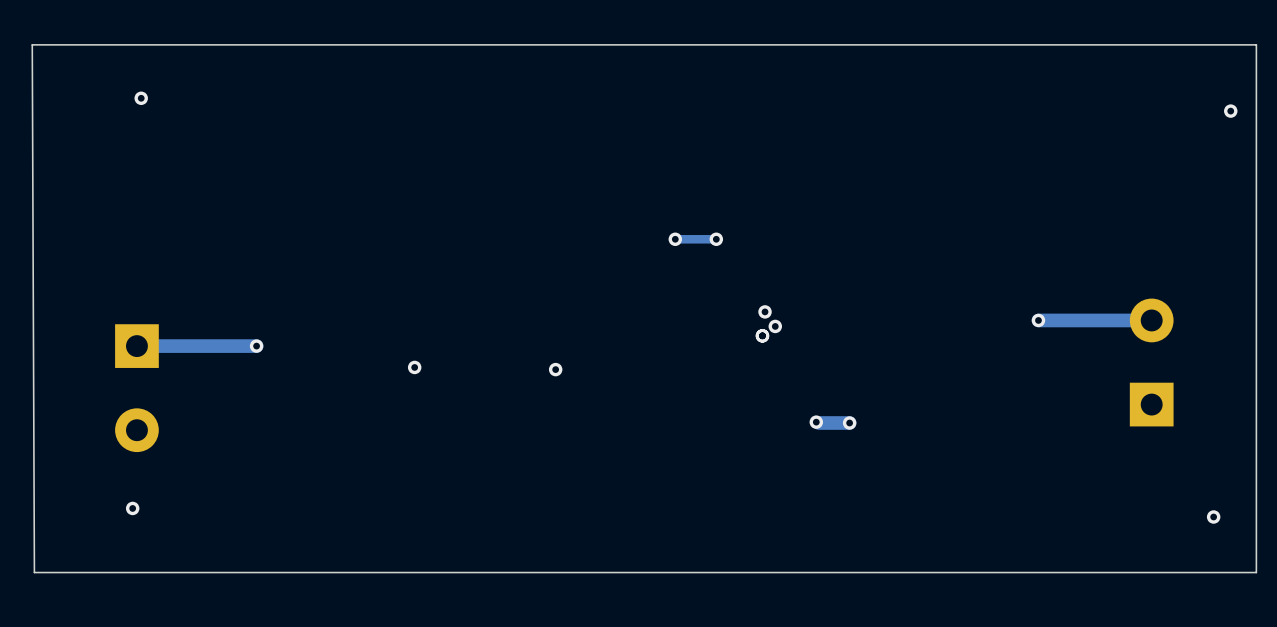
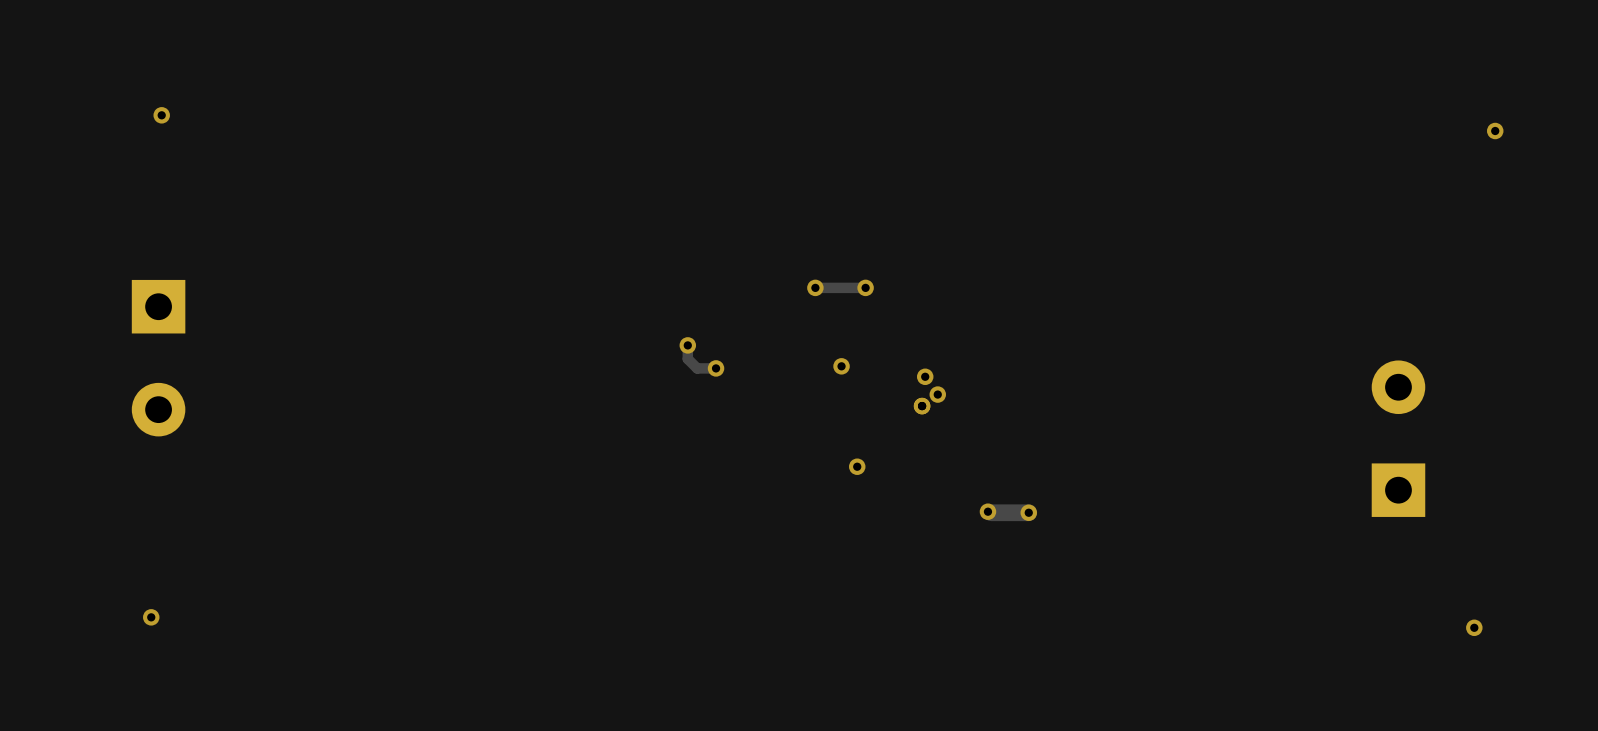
board edge: (1256, 44) (1256, 572) (34, 572) (32, 44) (1256, 44) -> none
track: none -> (687, 345) (687, 359) (697, 368) (716, 368)
via: none -> (687, 345)
via: none -> (841, 366)
via: none -> (716, 368)
via: (1038, 320) -> none
track: (1151, 320) (1038, 320) -> none
track: (256, 346) (136, 346) -> none
via: (256, 346) -> none
via: (414, 367) -> none
via: (555, 369) -> none
via: none -> (857, 466)
part position: (136, 388) -> (158, 358)

